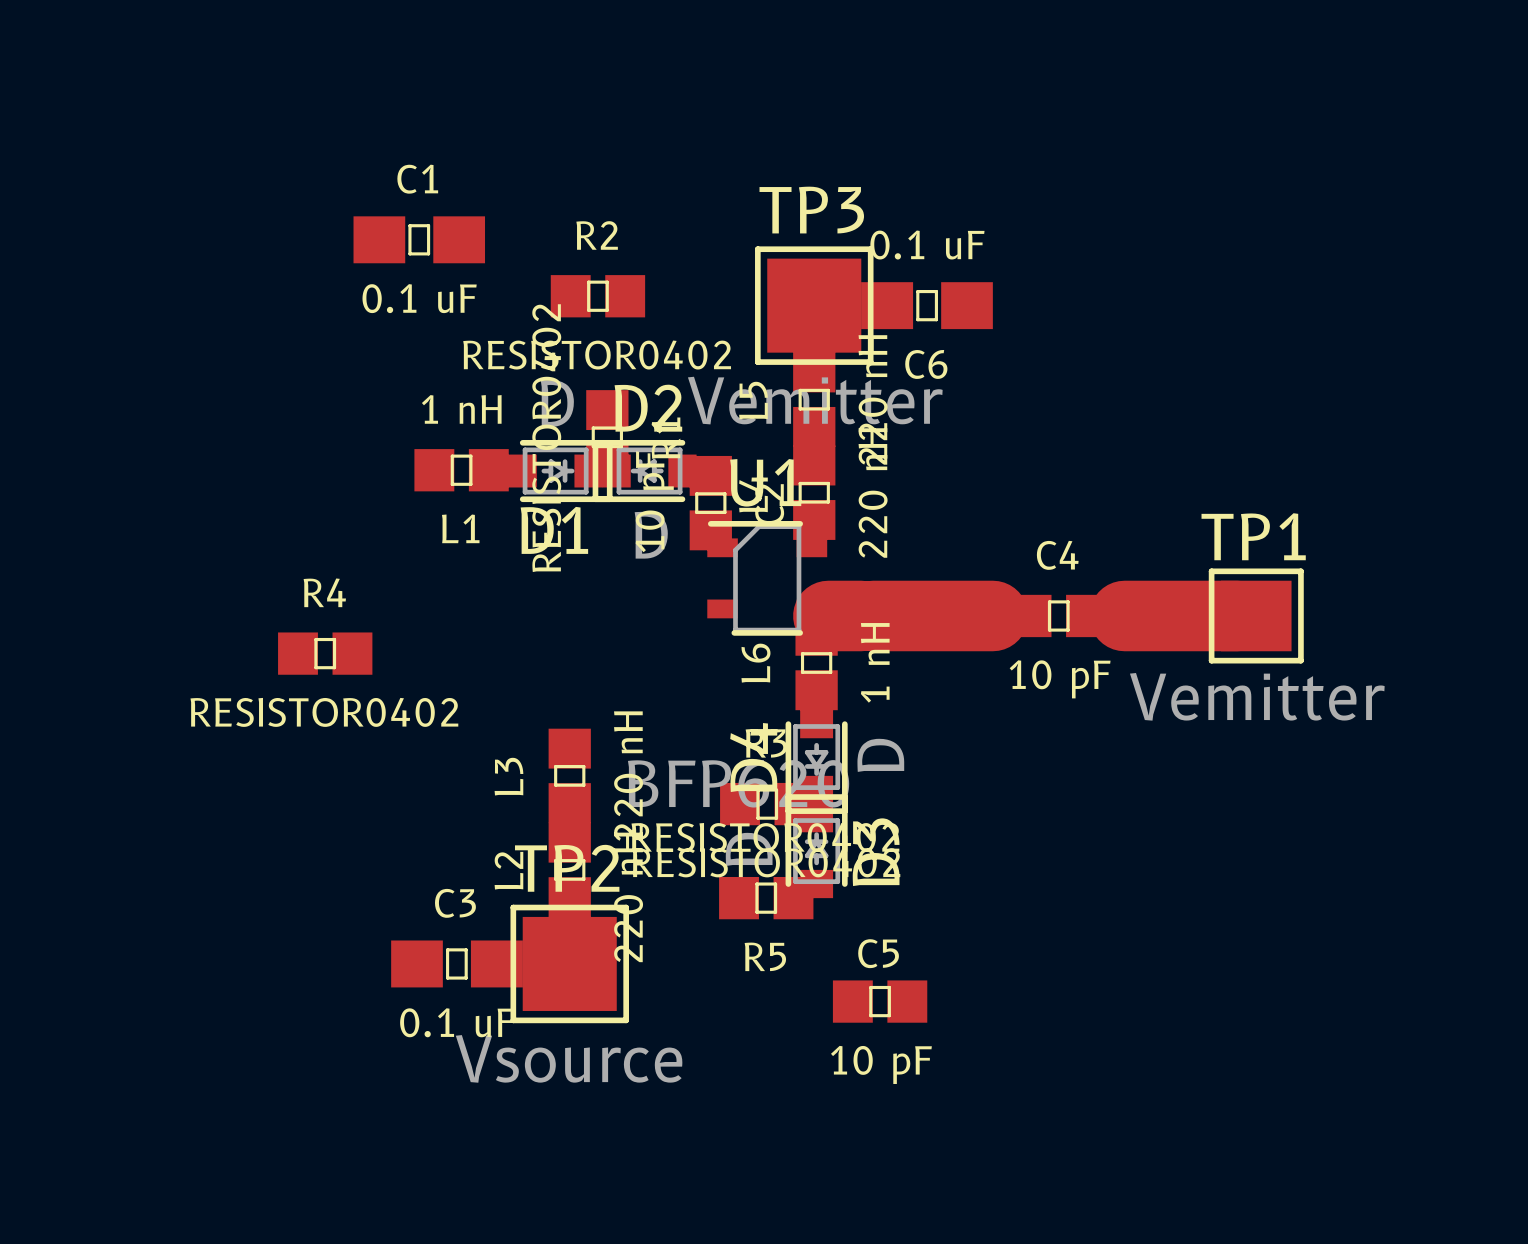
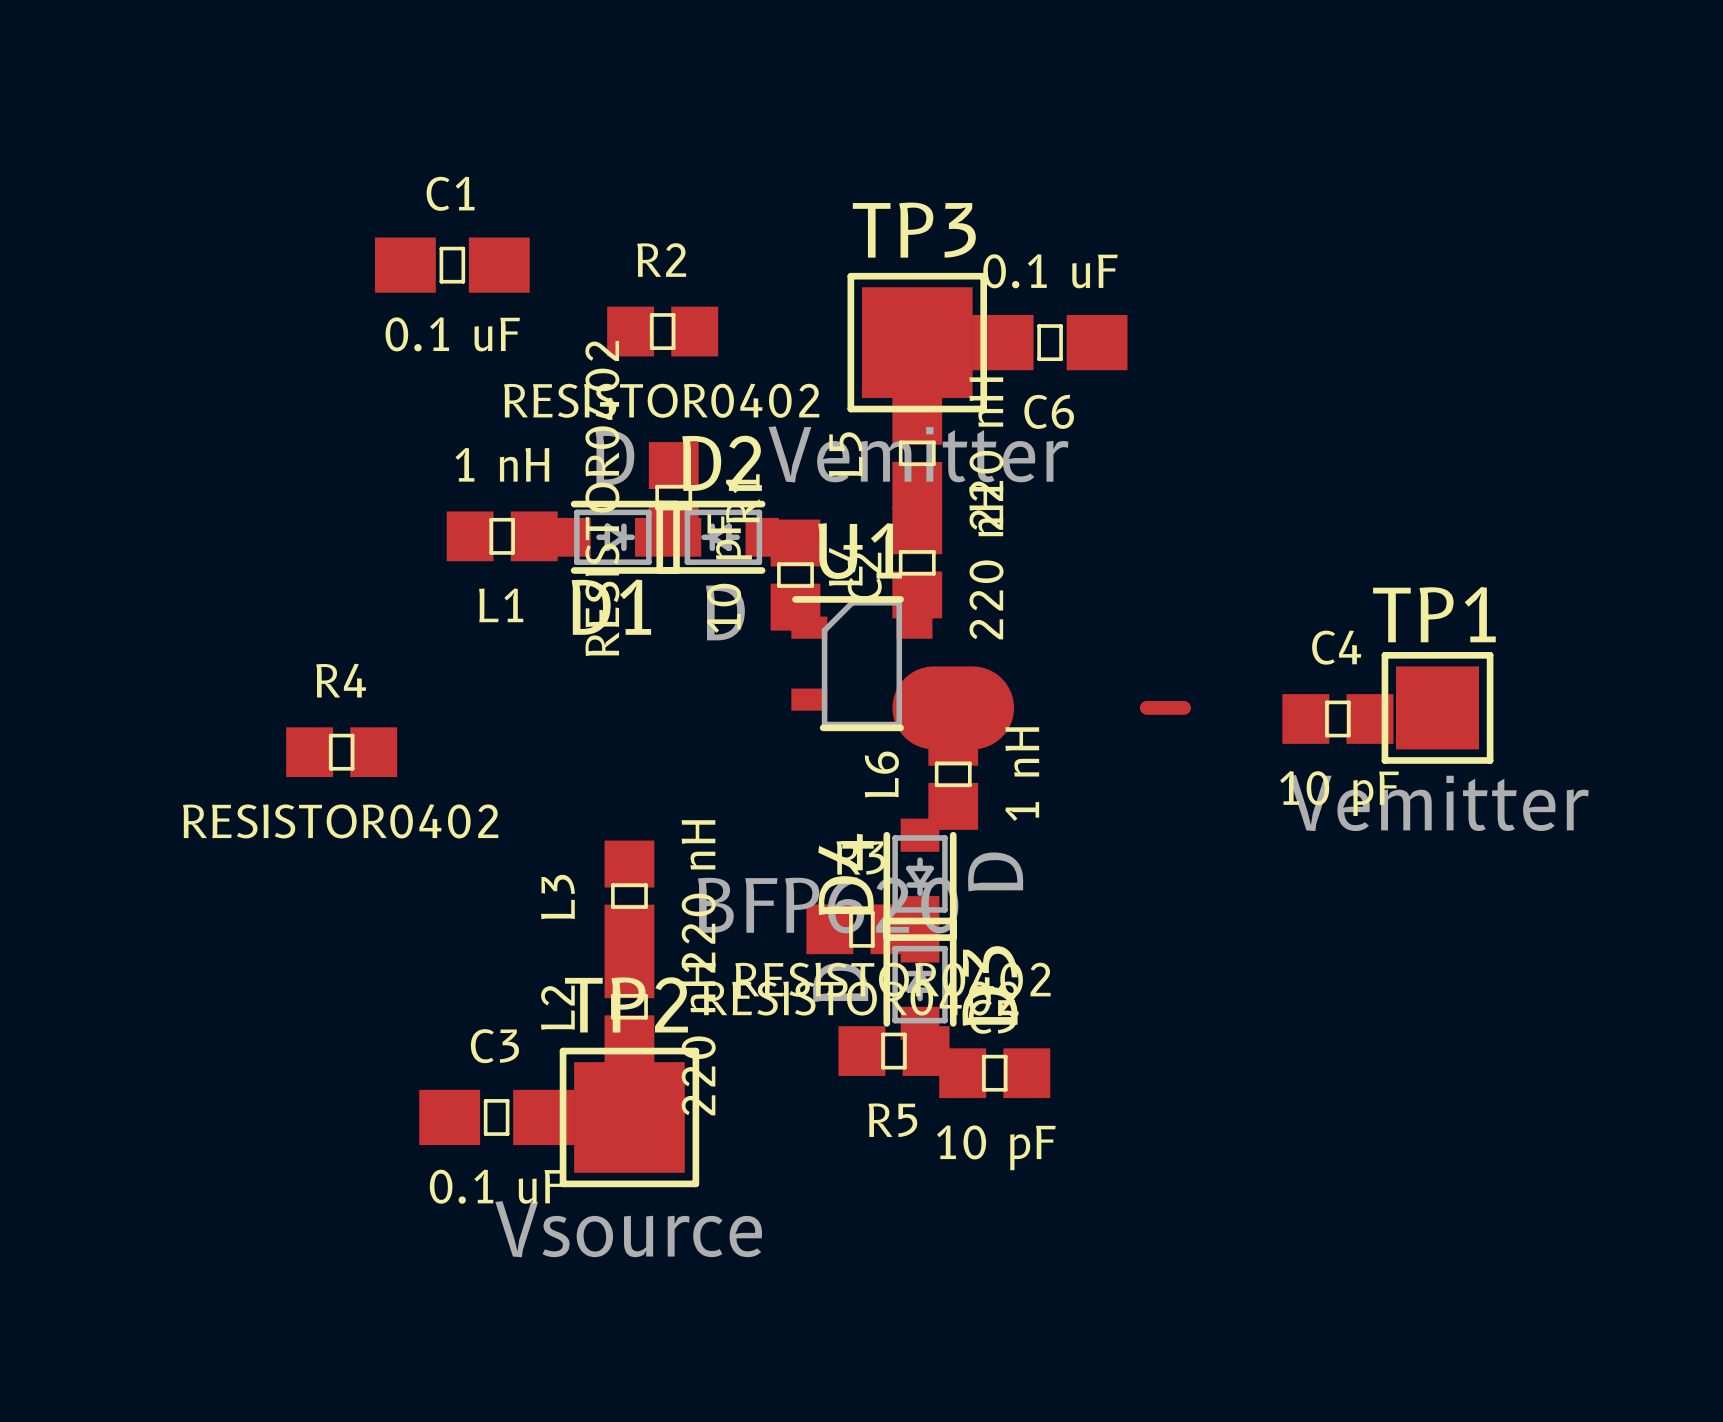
top track: (873, 615) (992, 615) -> none
C4 position: (1058, 615) -> (1337, 718)
top track: (1124, 615) (1237, 615) -> none
L6 position: (816, 663) -> (953, 774)
R5 position: (766, 898) -> (893, 1051)
C5 position: (880, 1001) -> (994, 1073)

